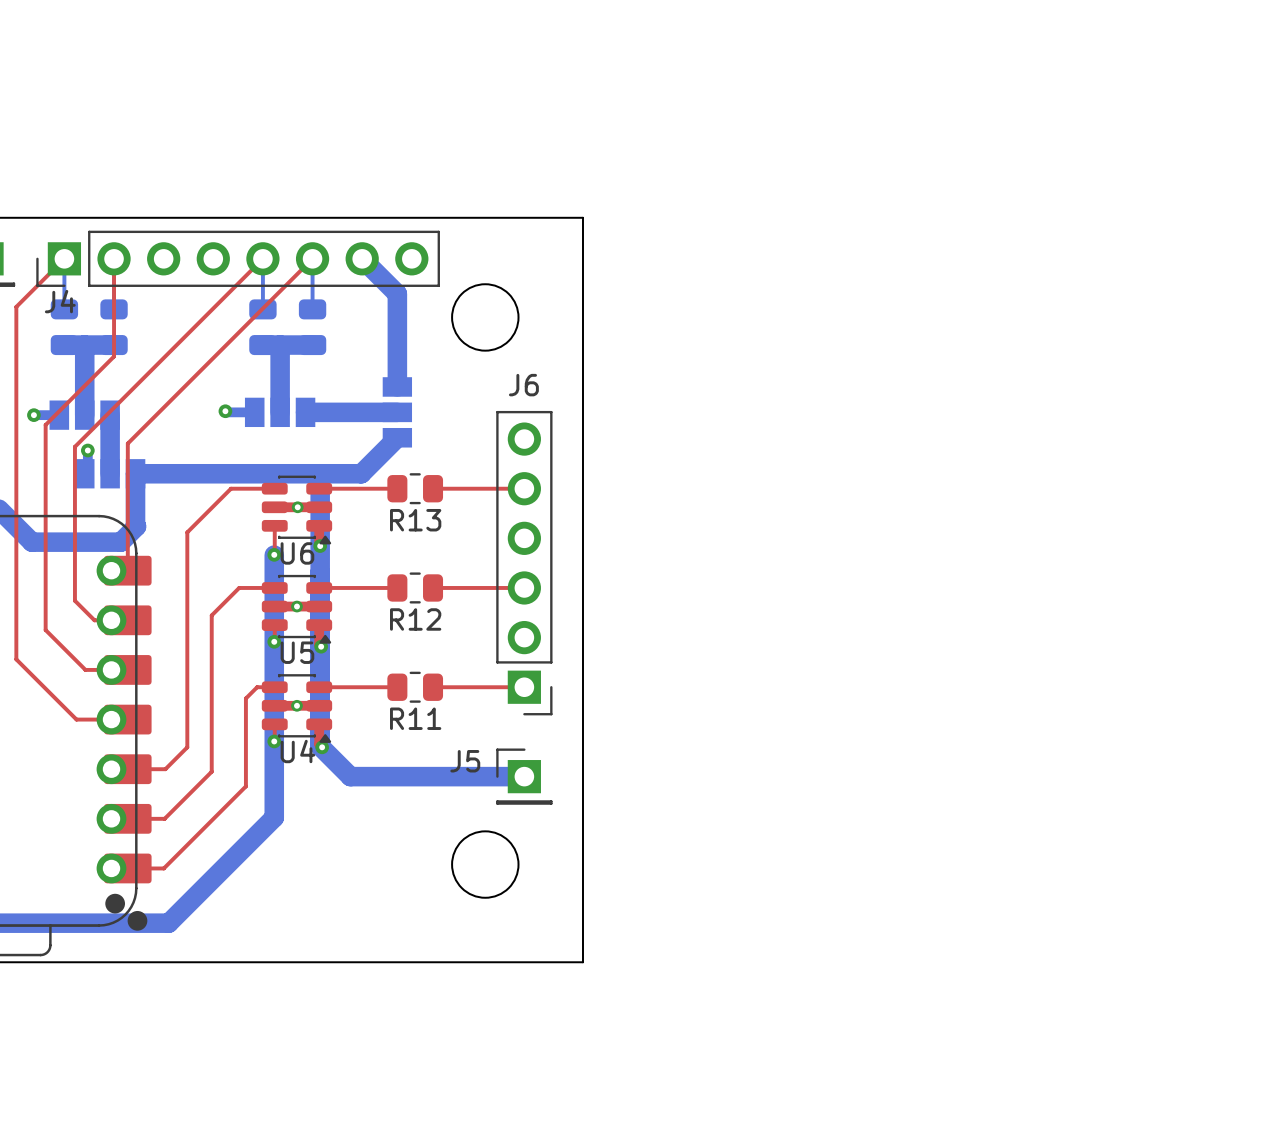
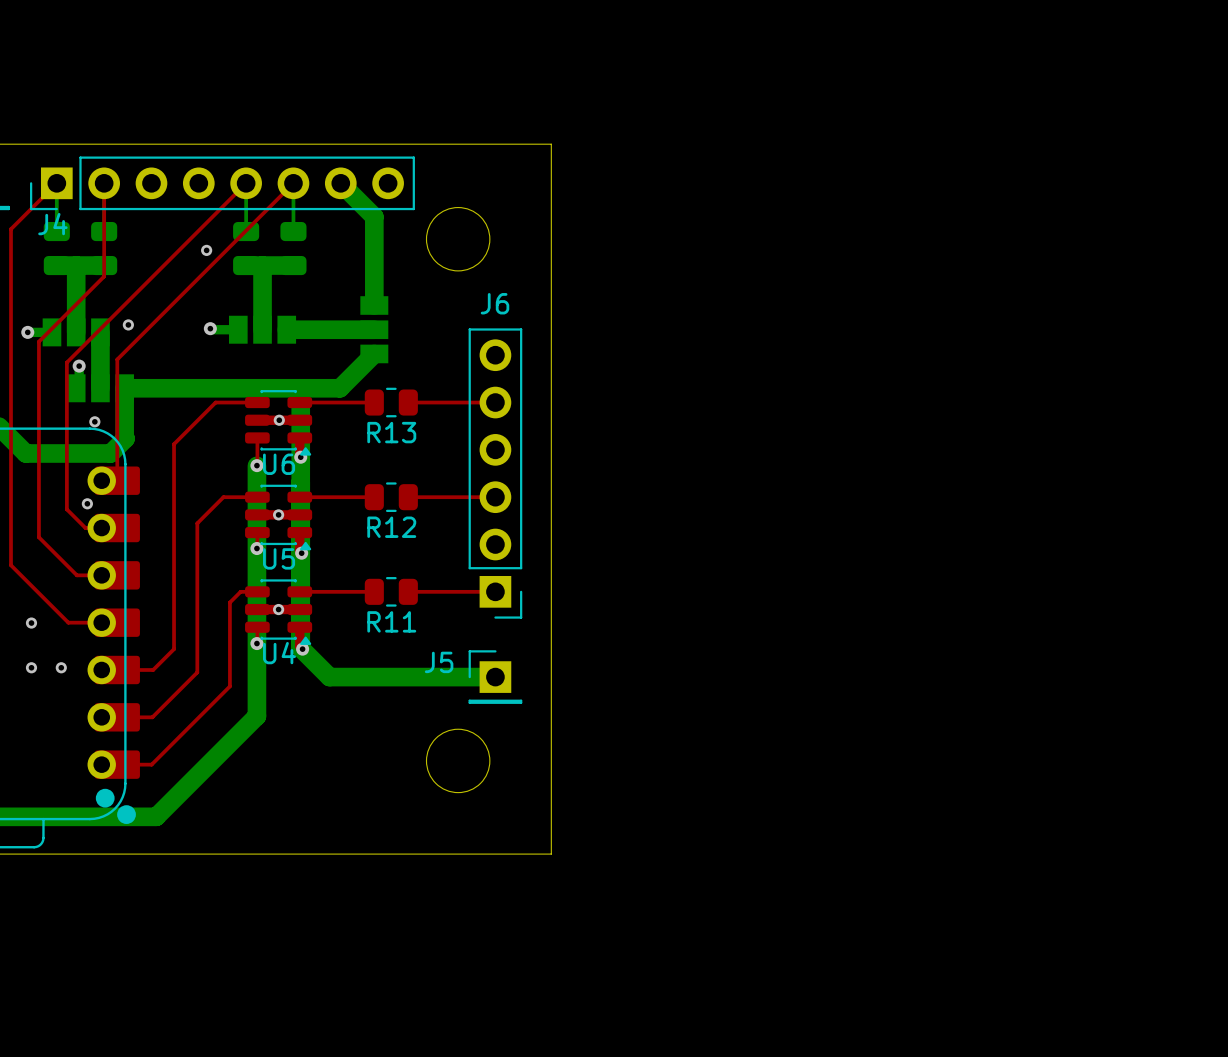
via: none -> (206, 250)
via: none -> (128, 324)
via: none -> (94, 421)
via: none -> (87, 503)
via: none -> (31, 623)
via: none -> (31, 667)
via: none -> (61, 667)

